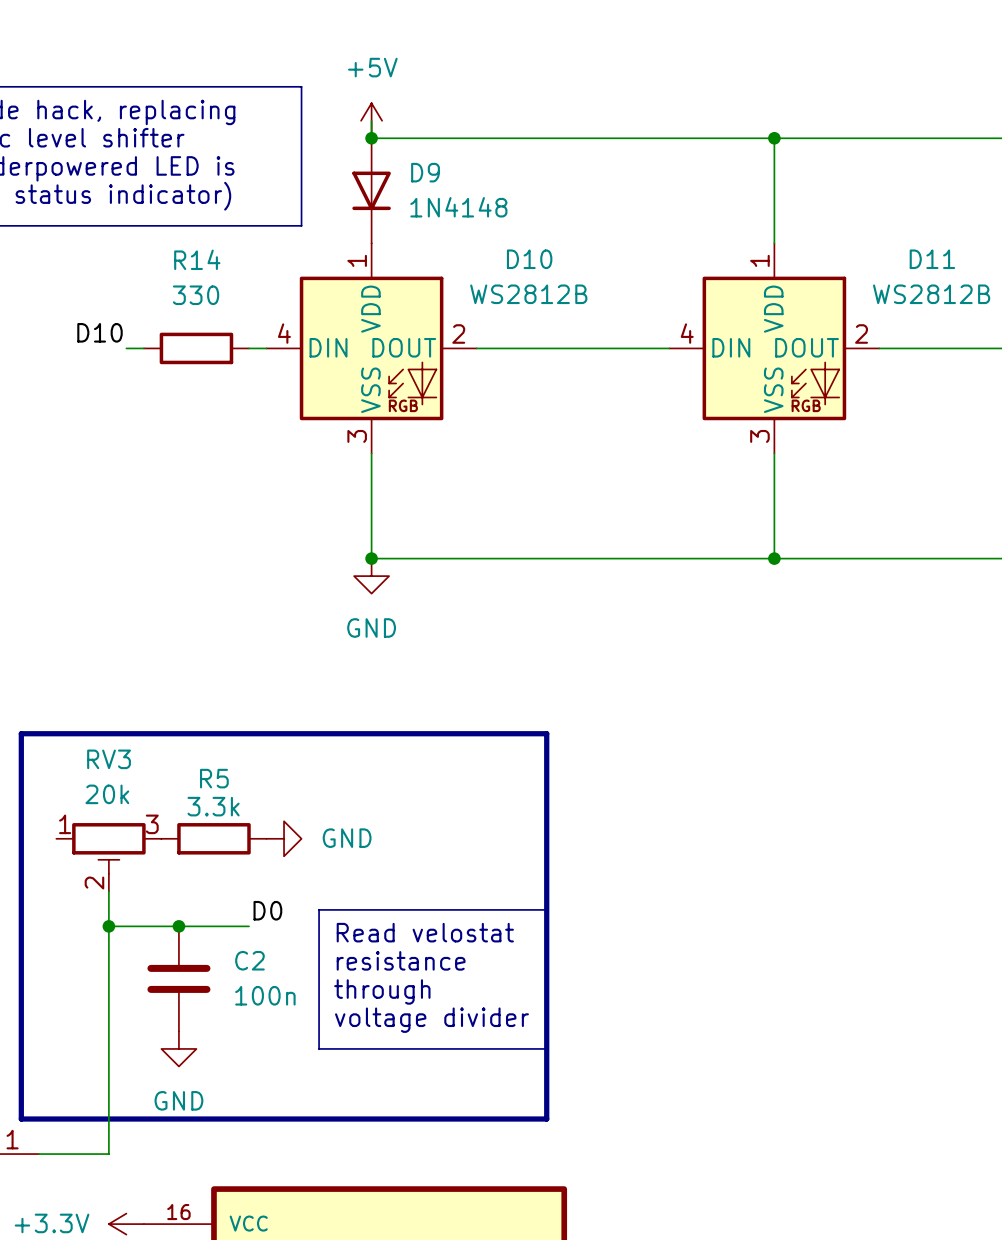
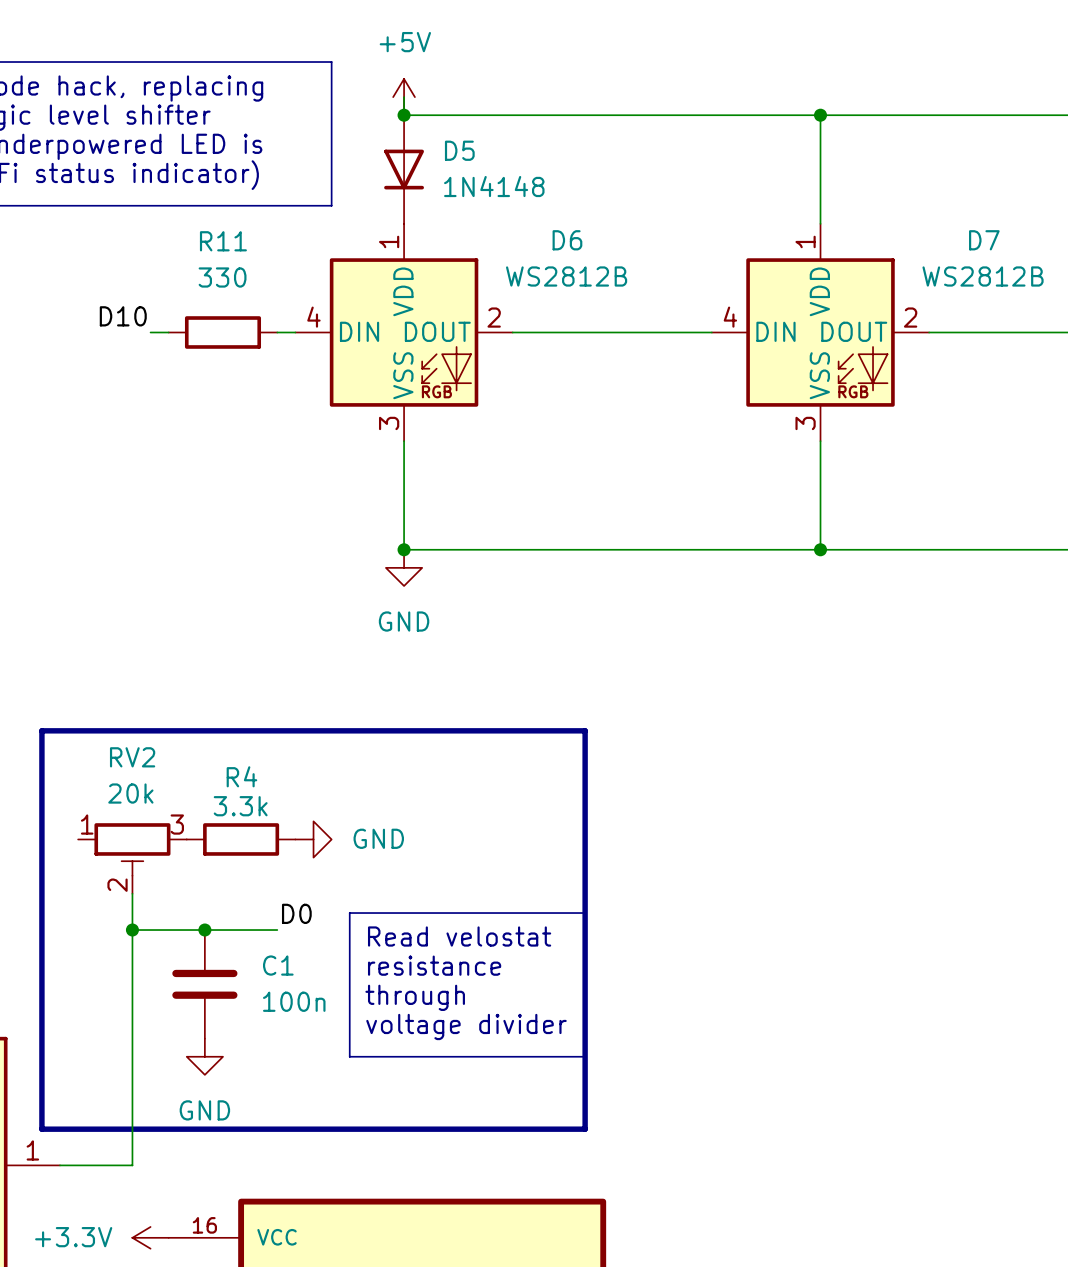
D9 name: D9 (425, 172) -> D5 (459, 150)
R14 name: R14 (197, 259) -> R11 (223, 241)
D10 name: D10 (529, 259) -> D6 (567, 240)
D11 name: D11 (932, 259) -> D7 (984, 240)
RV3 name: RV3 (109, 759) -> RV2 (132, 757)
R5 name: R5 (214, 778) -> R4 (241, 776)
C2 name: C2 (249, 960) -> C1 (278, 965)

